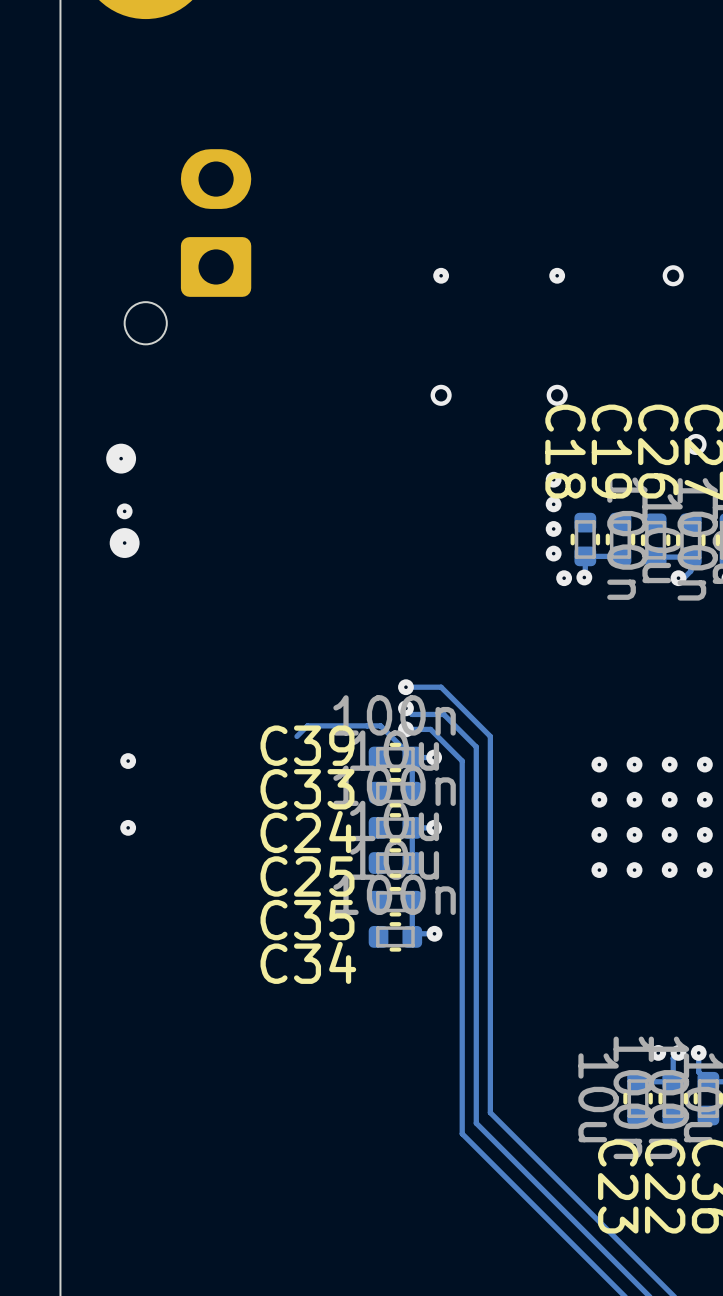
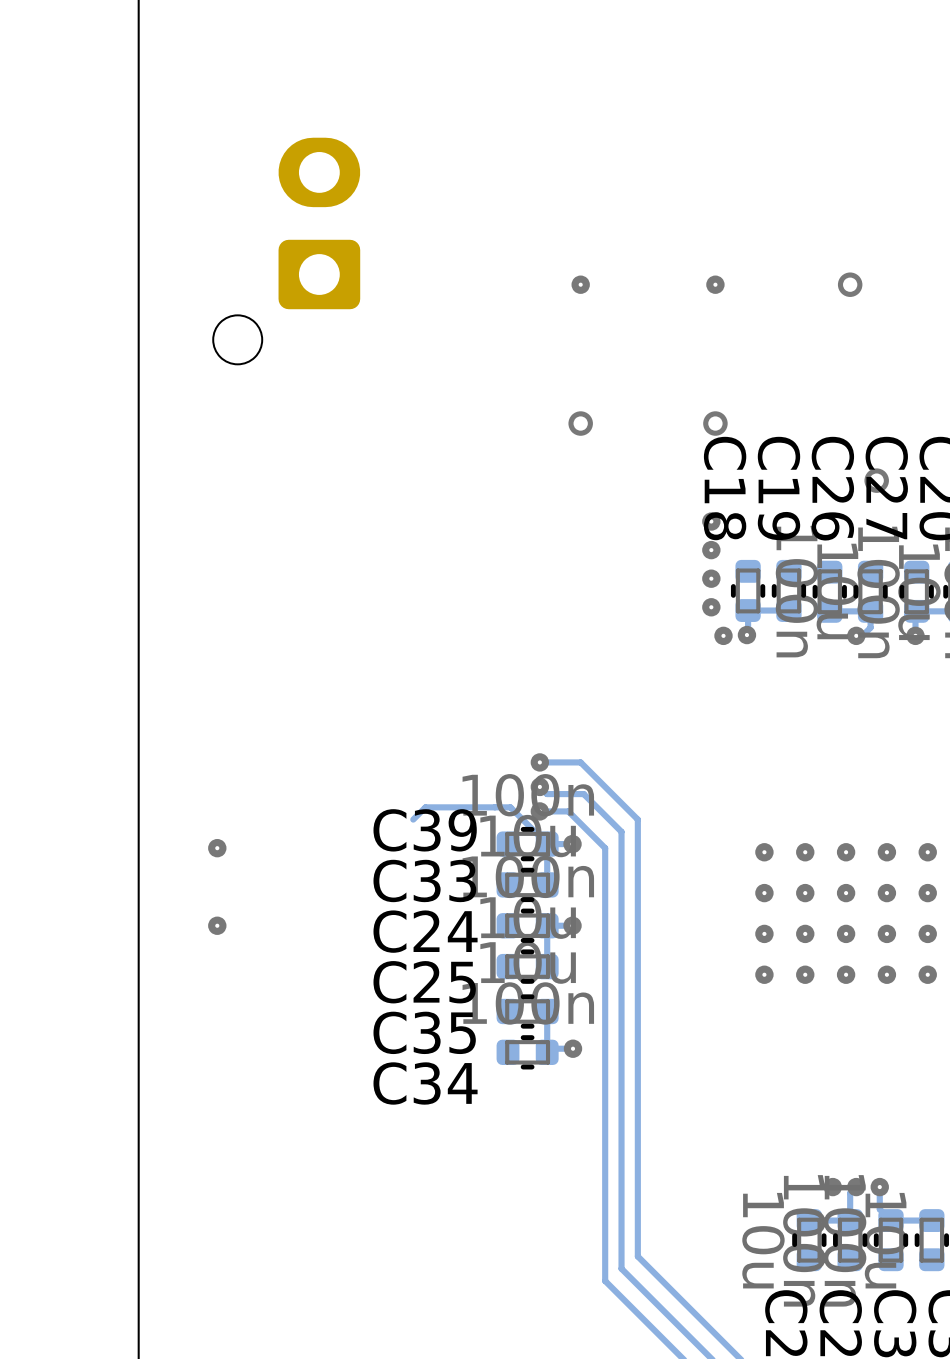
via: (121, 458) -> none
via: (124, 511) -> none
via: (124, 543) -> none

